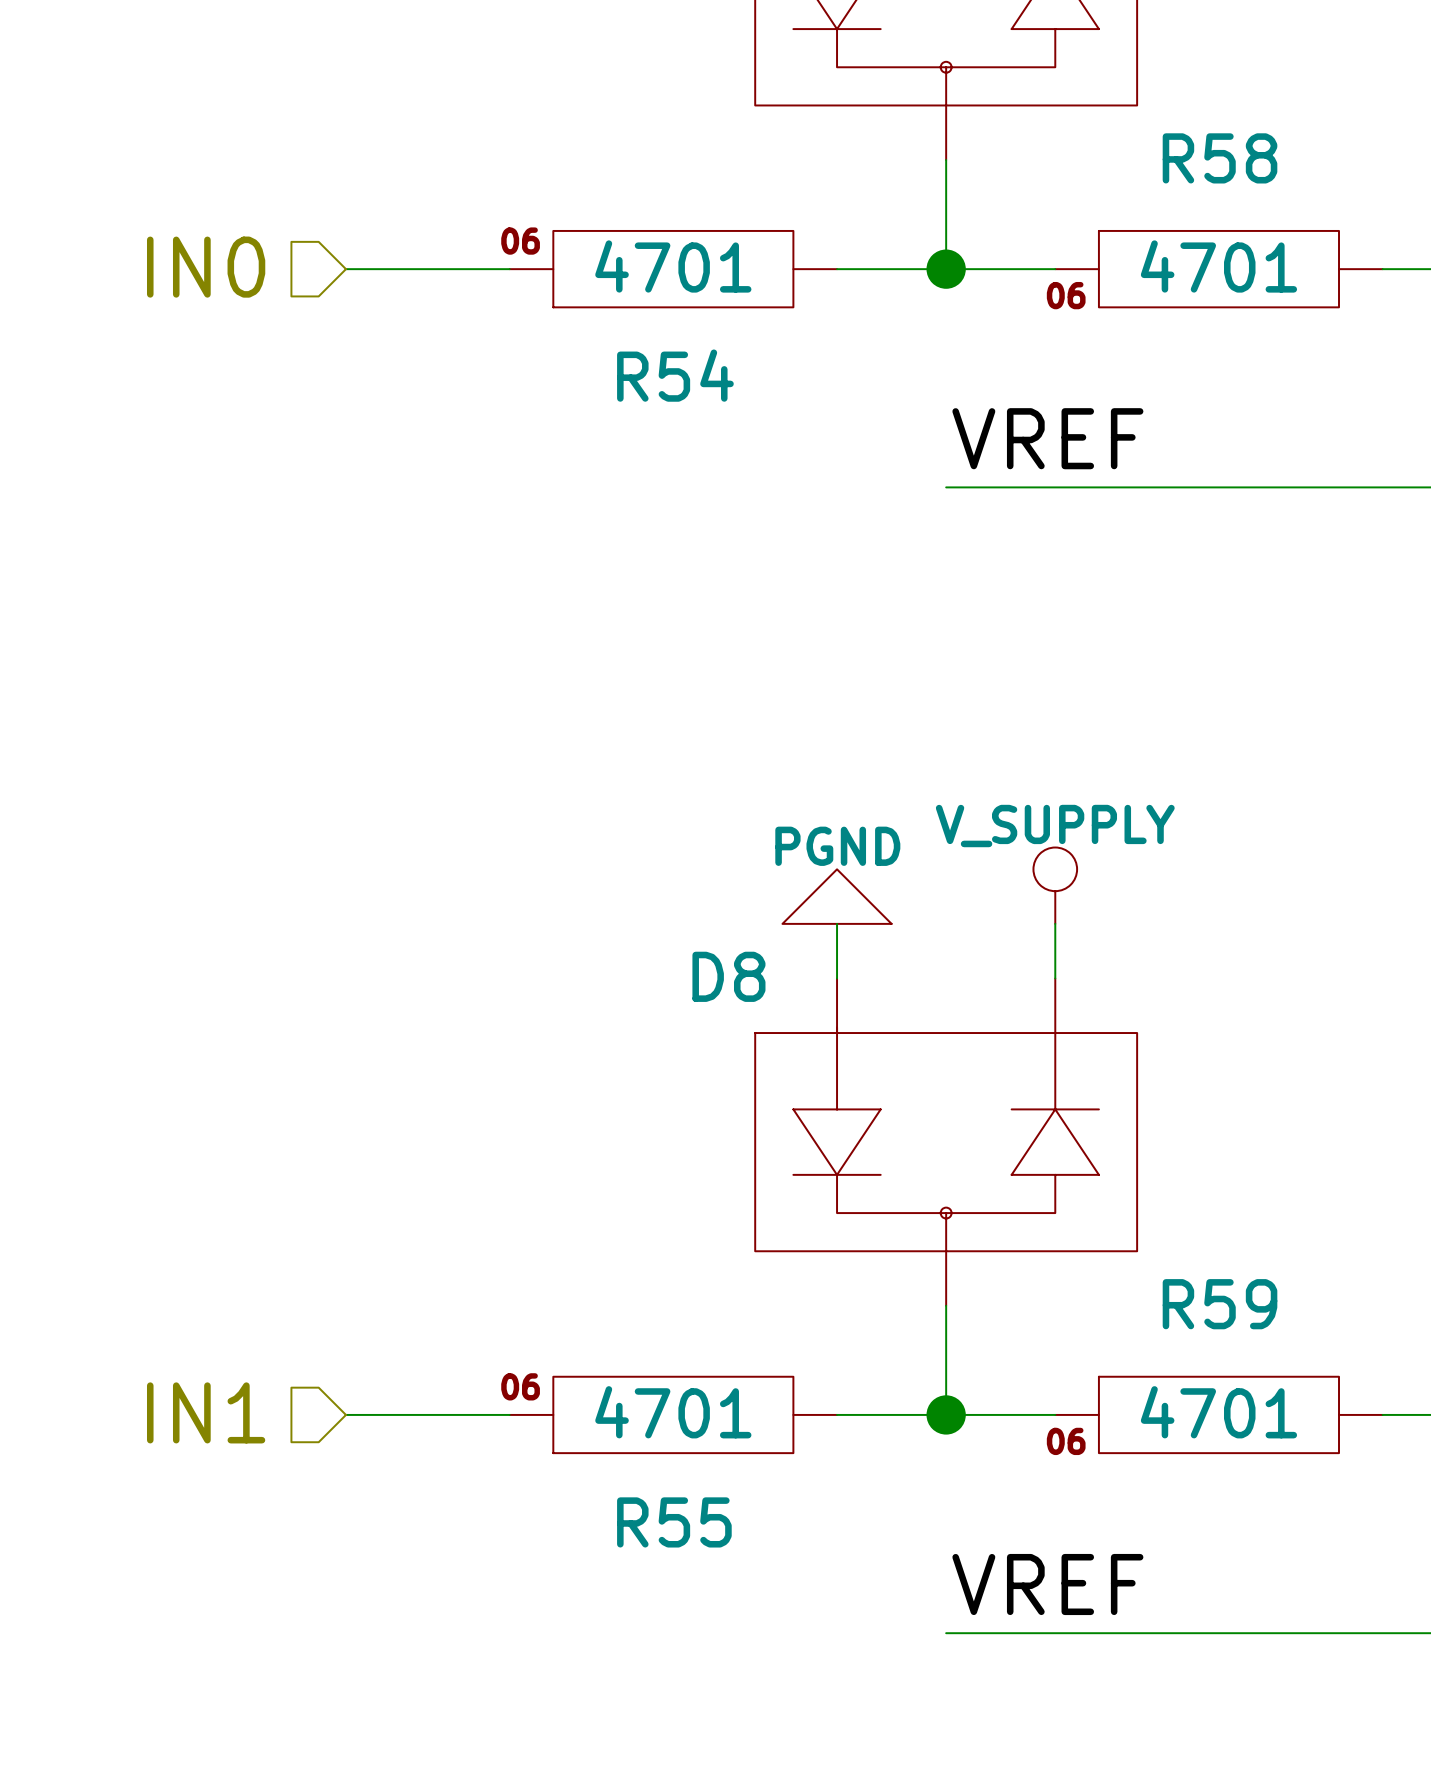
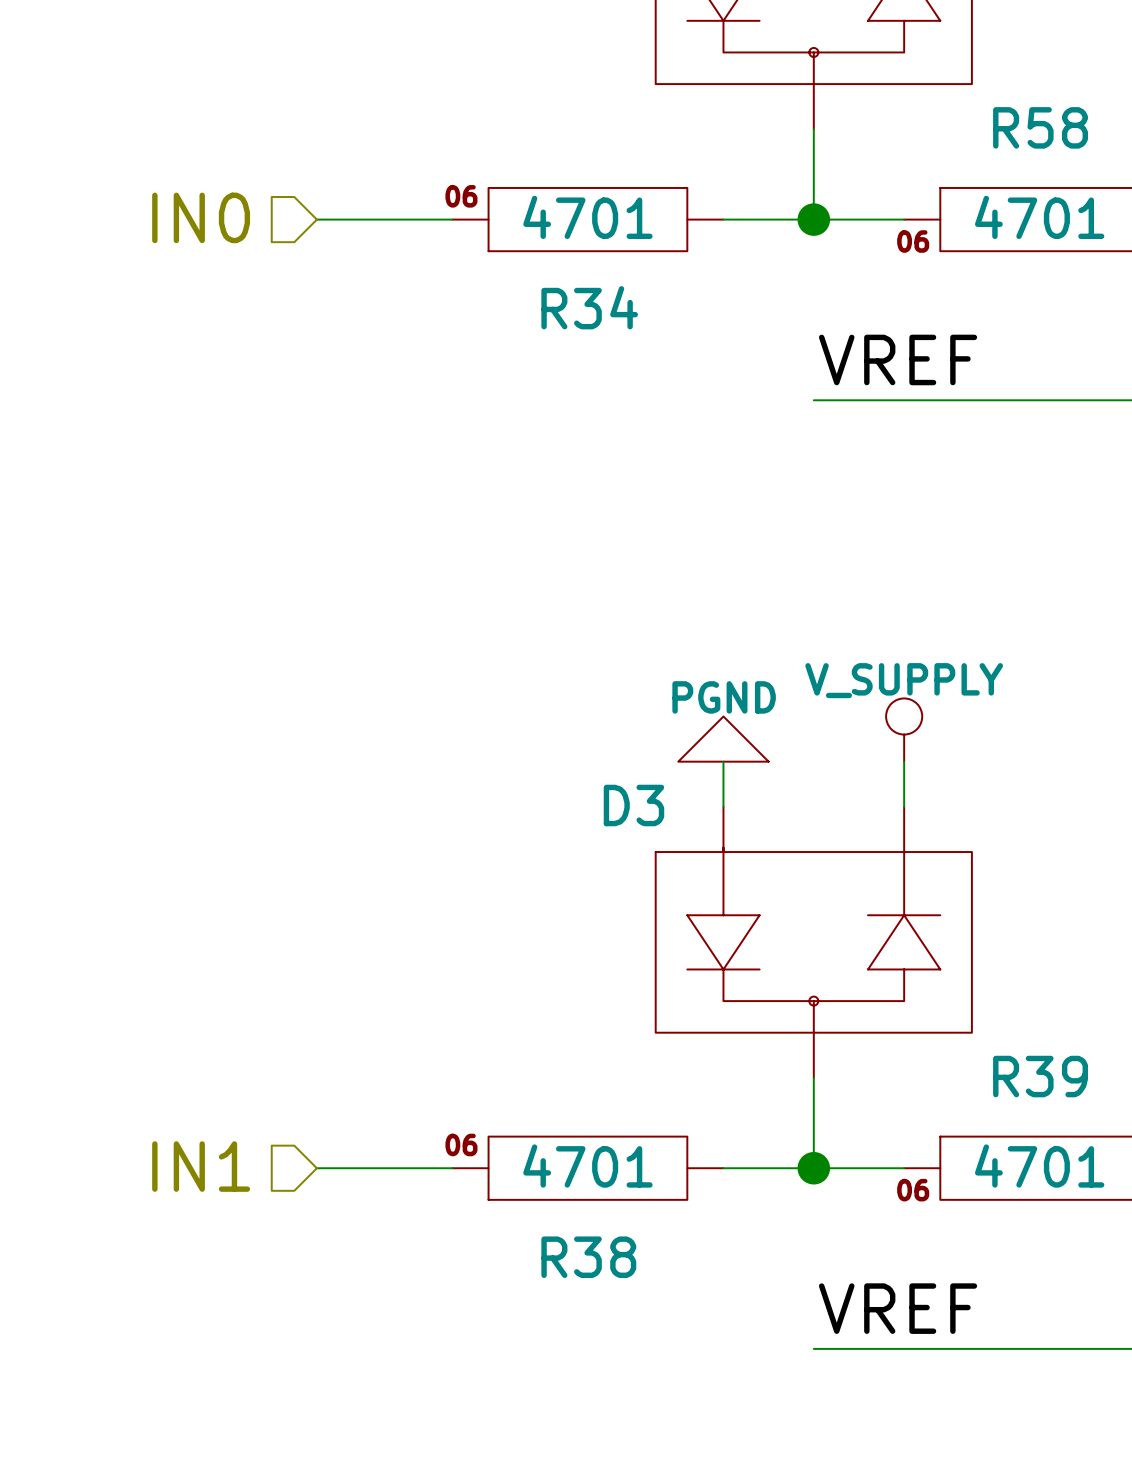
R54 name: R54 (675, 375) -> R34 (589, 307)
D8 name: D8 (728, 976) -> D3 (633, 805)
R59 name: R59 (1220, 1304) -> R39 (1040, 1076)
R55 name: R55 (674, 1522) -> R38 (588, 1257)

